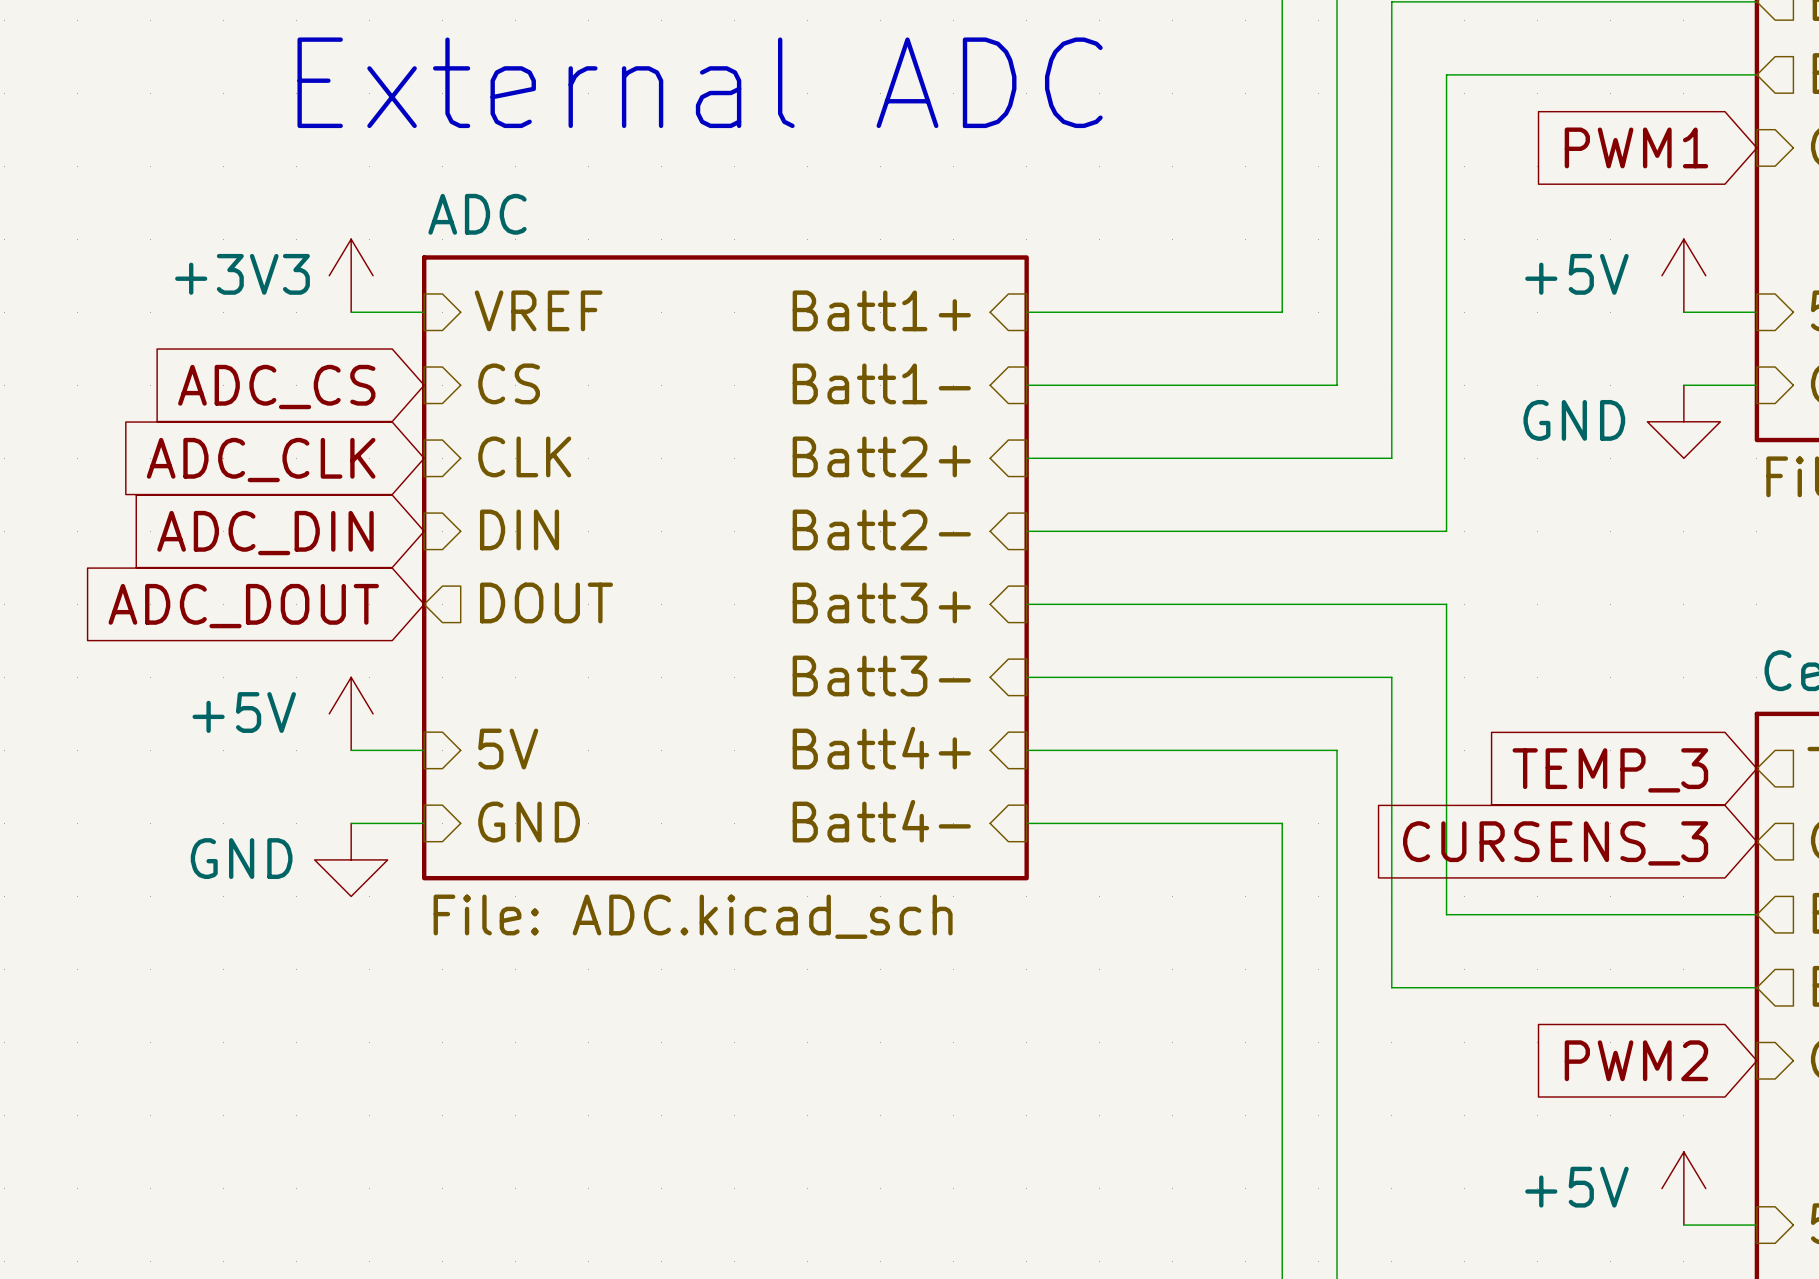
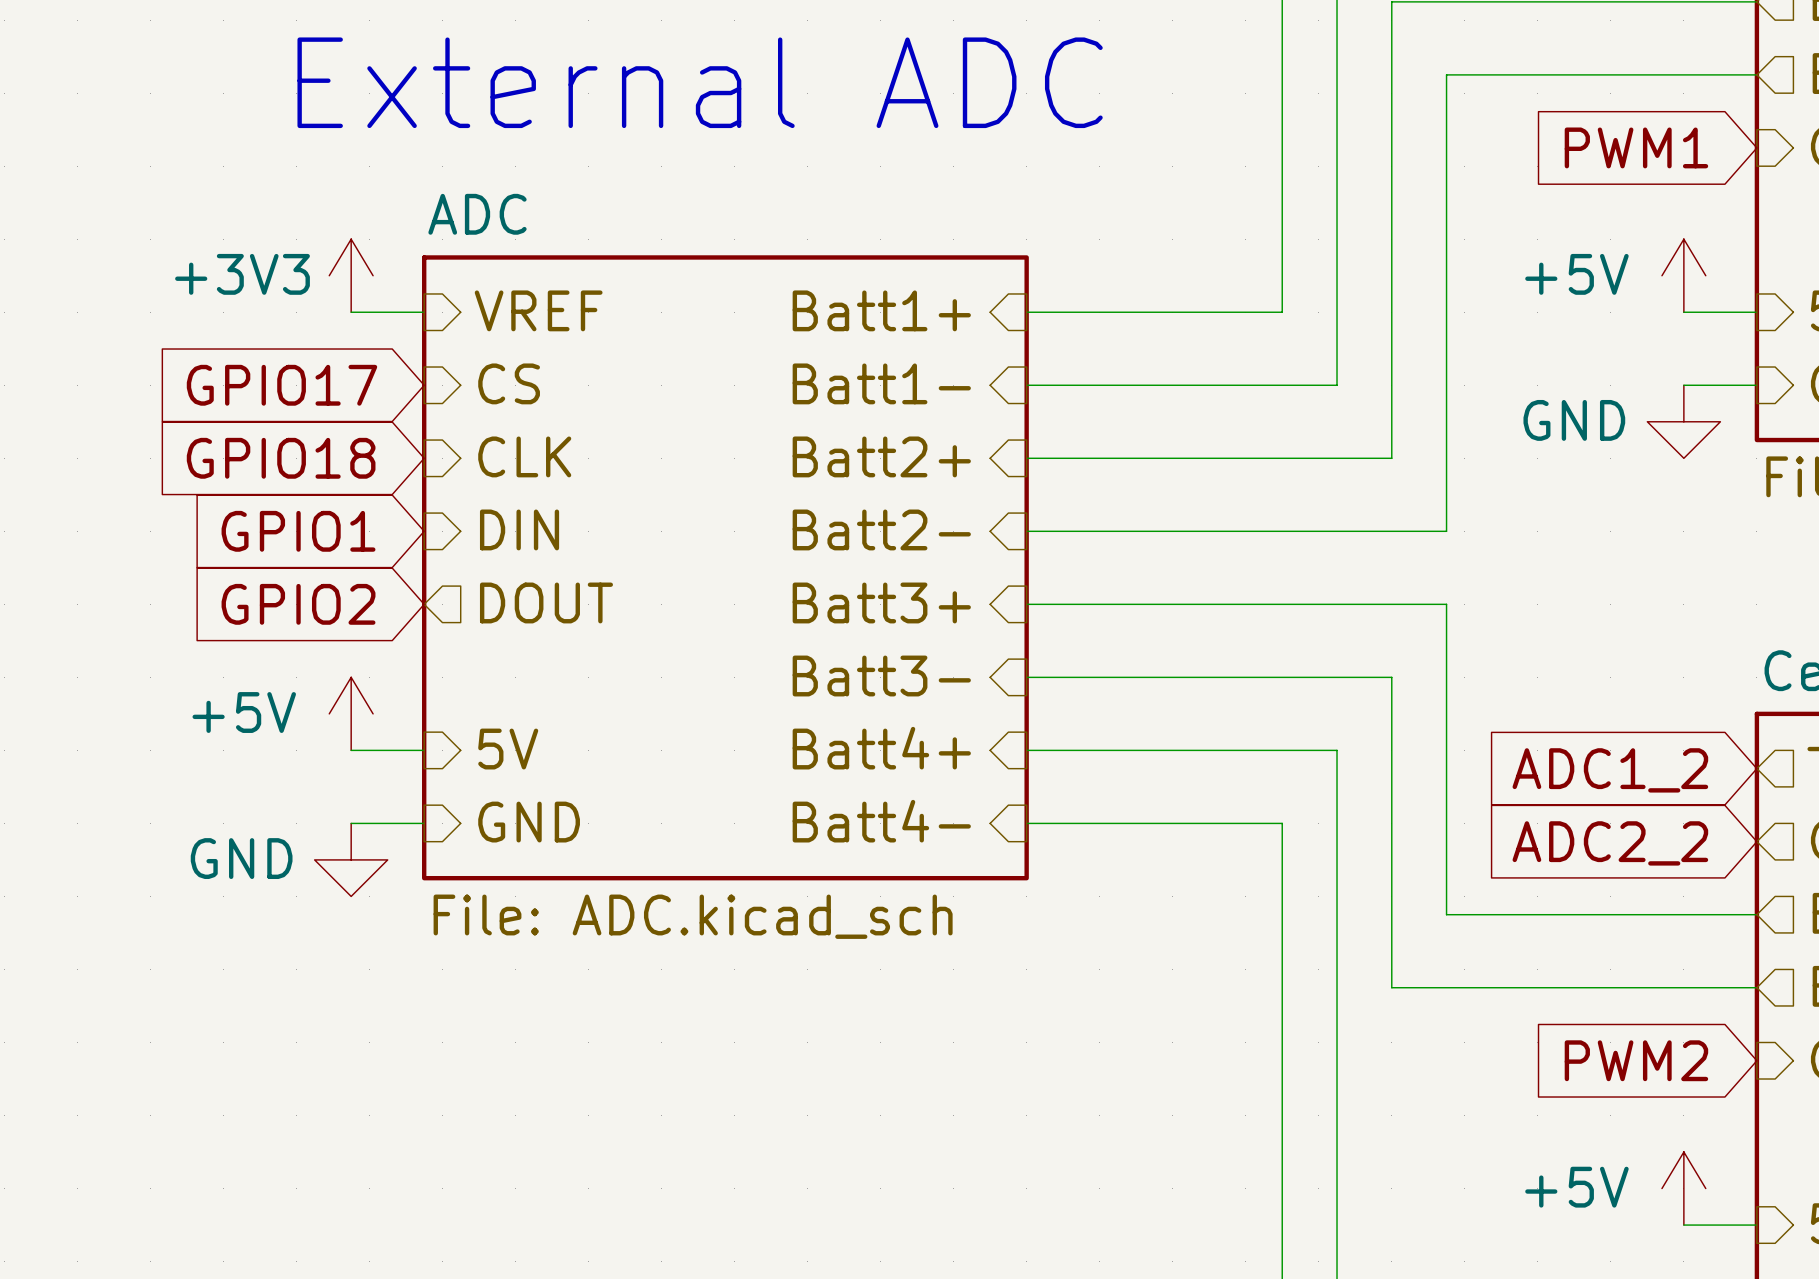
global label: ADC_CS (276, 387) -> GPIO17 (282, 385)
global label: ADC_CLK (261, 460) -> GPIO18 (281, 458)
global label: ADC_DIN (265, 533) -> GPIO1 (298, 531)
global label: ADC_DOUT (243, 606) -> GPIO2 (298, 604)
global label: TEMP_3 (1610, 770) -> ADC1_2 (1610, 770)
global label: CURSENS_3 (1555, 843) -> ADC2_2 (1610, 843)

